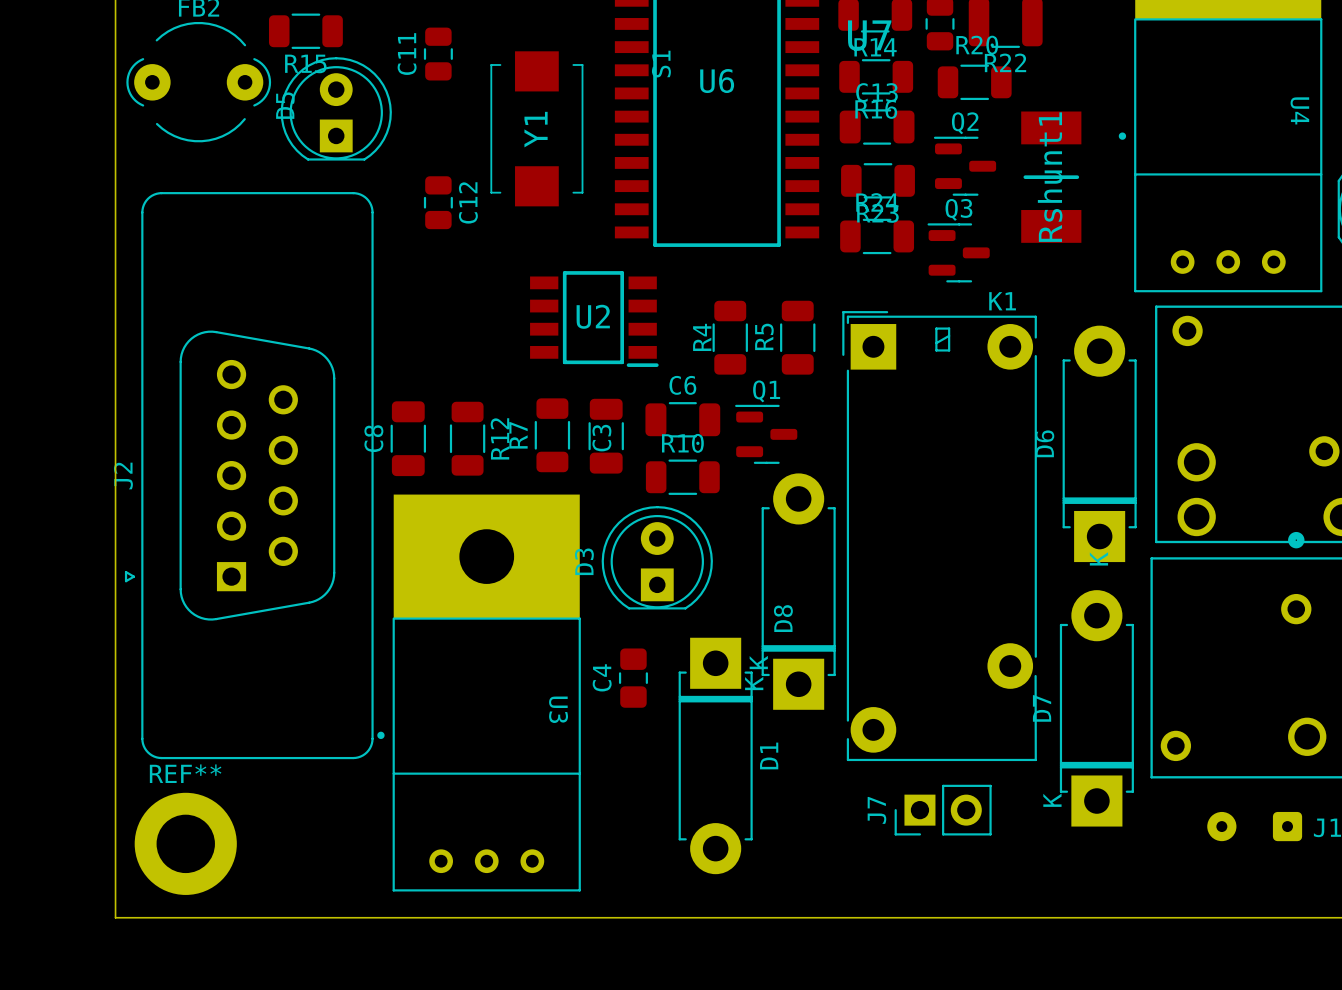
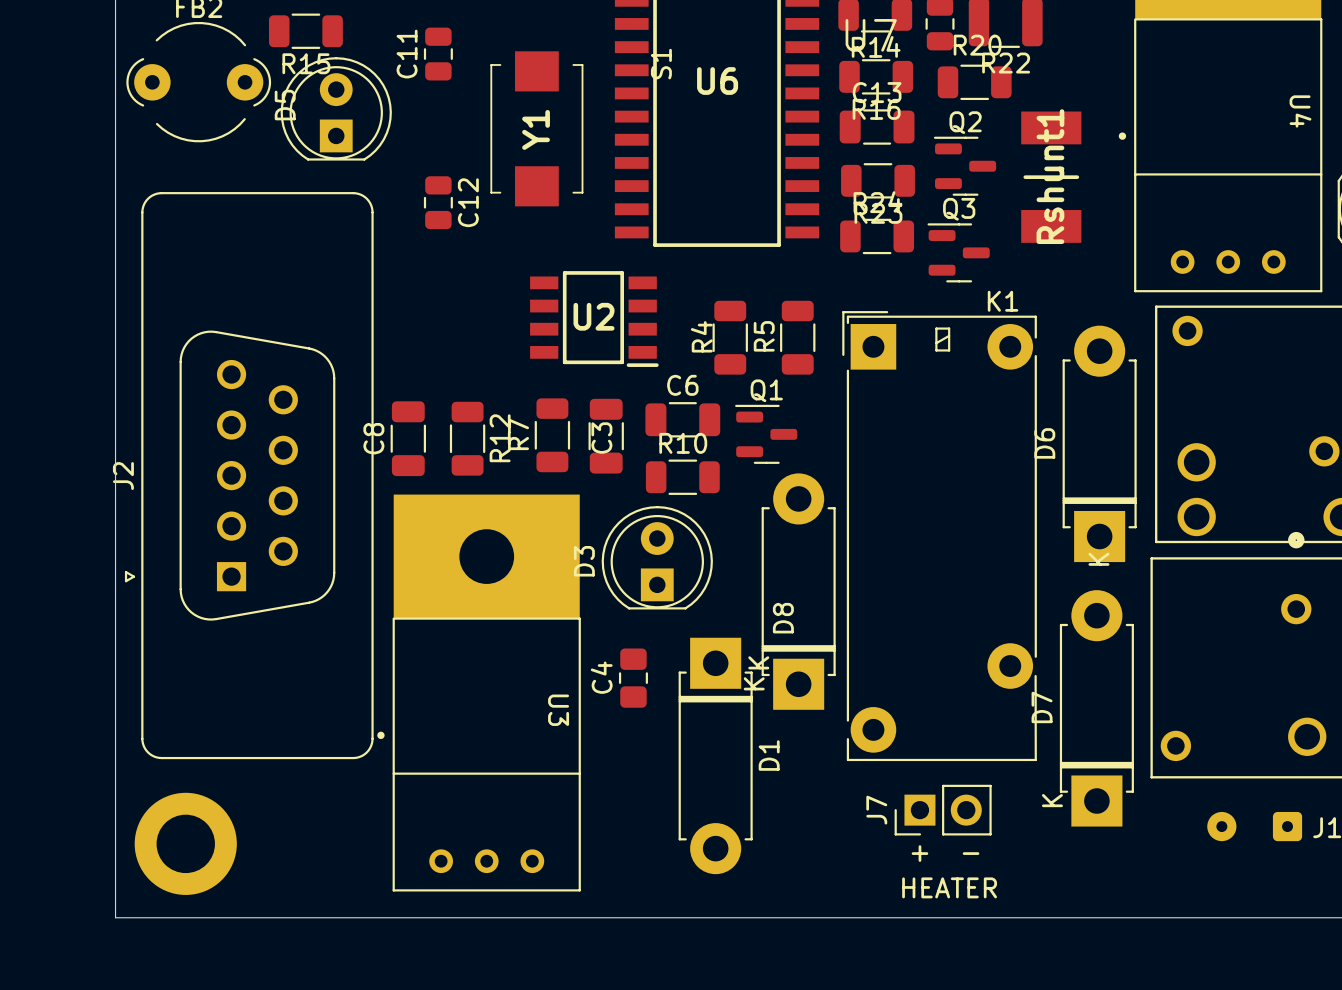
REF** name: REF** (185, 773) -> none
text: none -> + (919, 853)
text: none -> - (971, 853)
text: none -> HEATER (949, 887)

